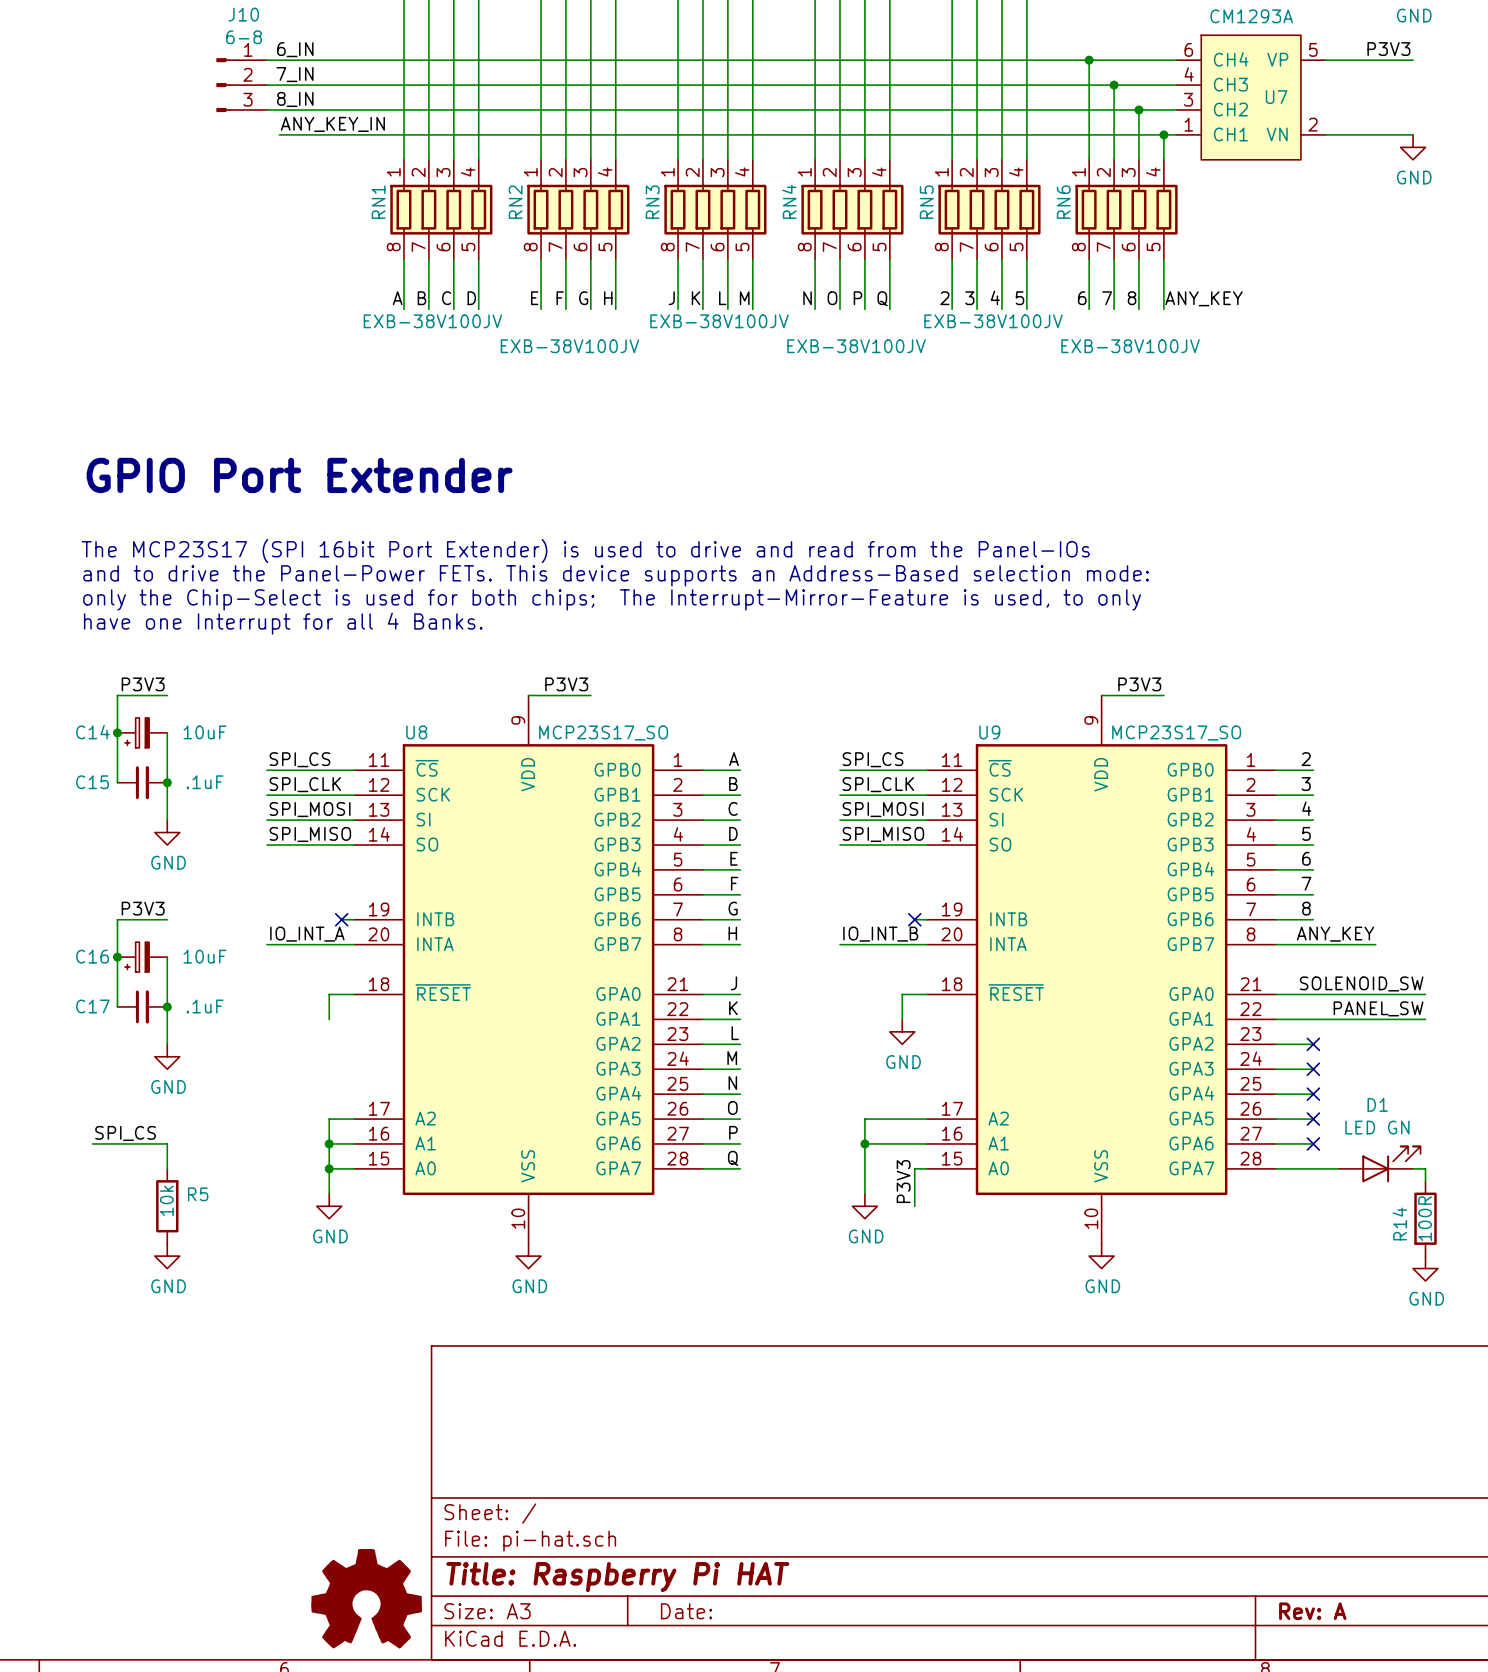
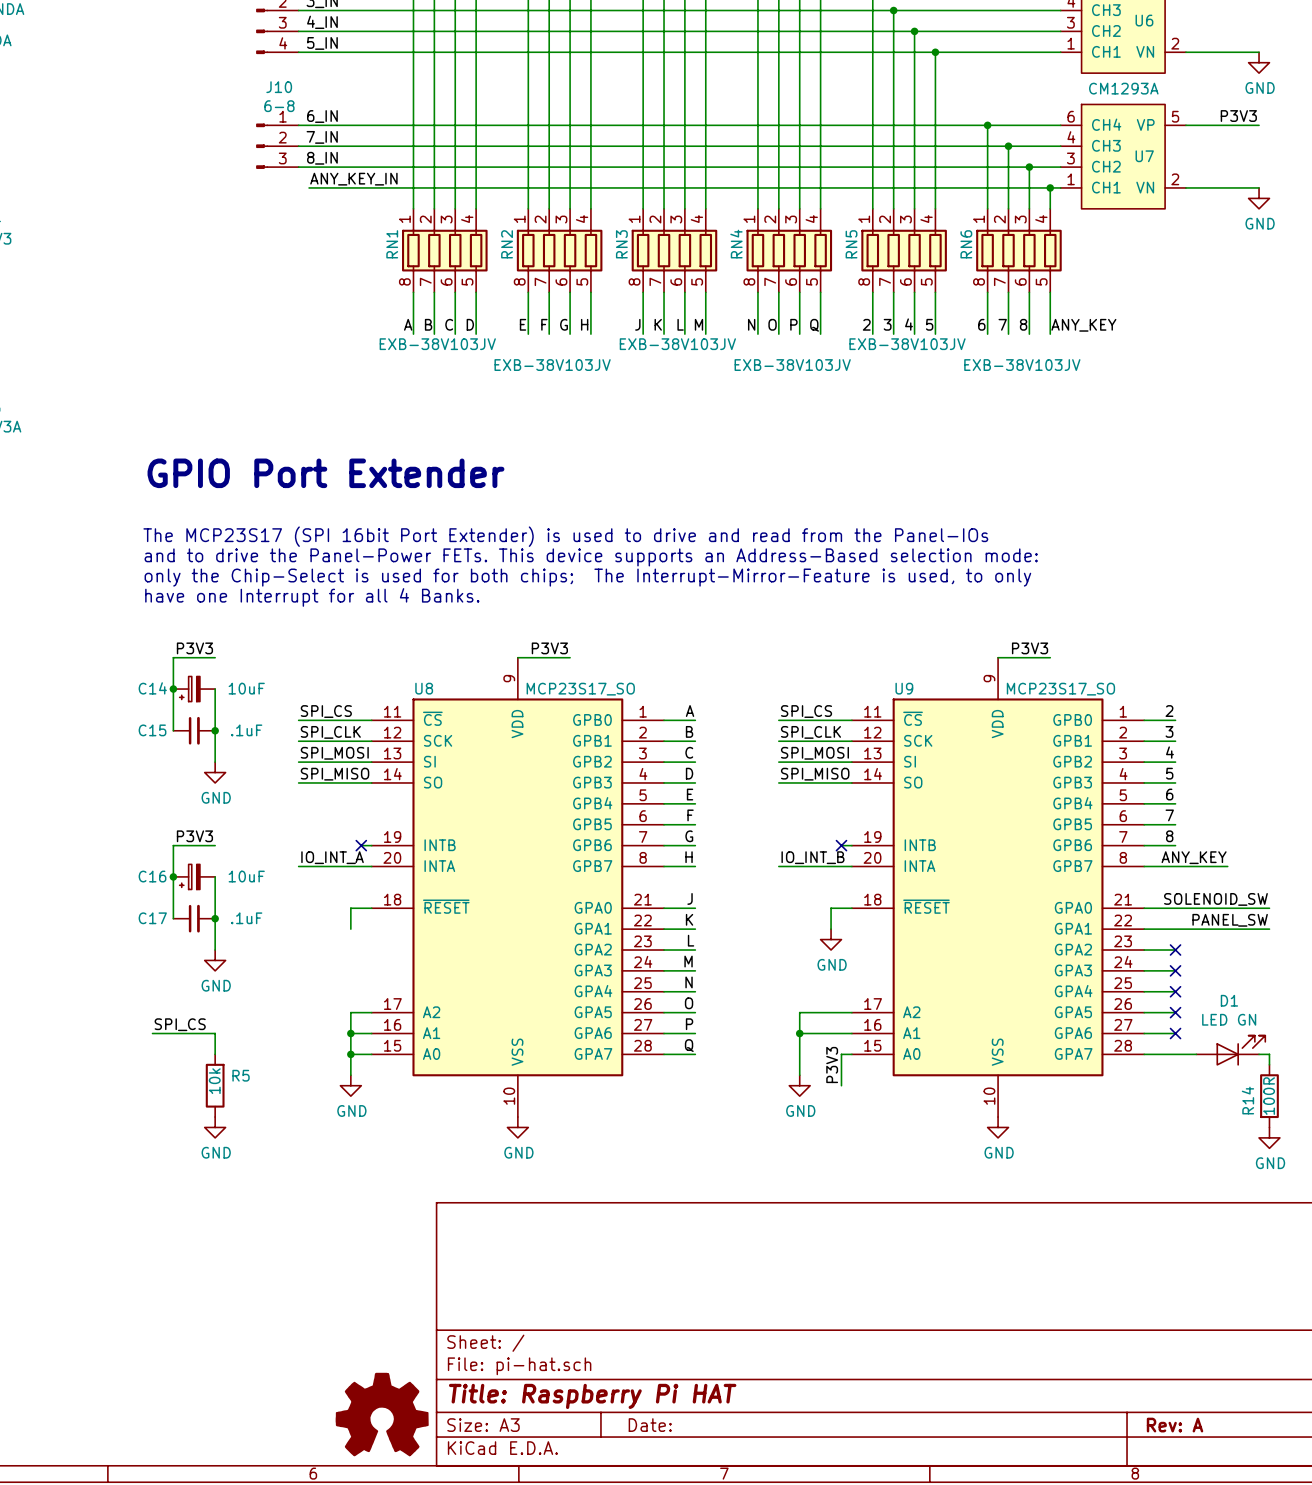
RN1 value: EXB-38V100JV (432, 321) -> EXB-38V103JV (437, 344)
RN3 value: EXB-38V100JV (719, 321) -> EXB-38V103JV (677, 344)
RN5 value: EXB-38V100JV (993, 321) -> EXB-38V103JV (907, 344)
RN2 value: EXB-38V100JV (569, 346) -> EXB-38V103JV (552, 365)
RN4 value: EXB-38V100JV (856, 346) -> EXB-38V103JV (792, 365)
RN6 value: EXB-38V100JV (1130, 346) -> EXB-38V103JV (1022, 365)

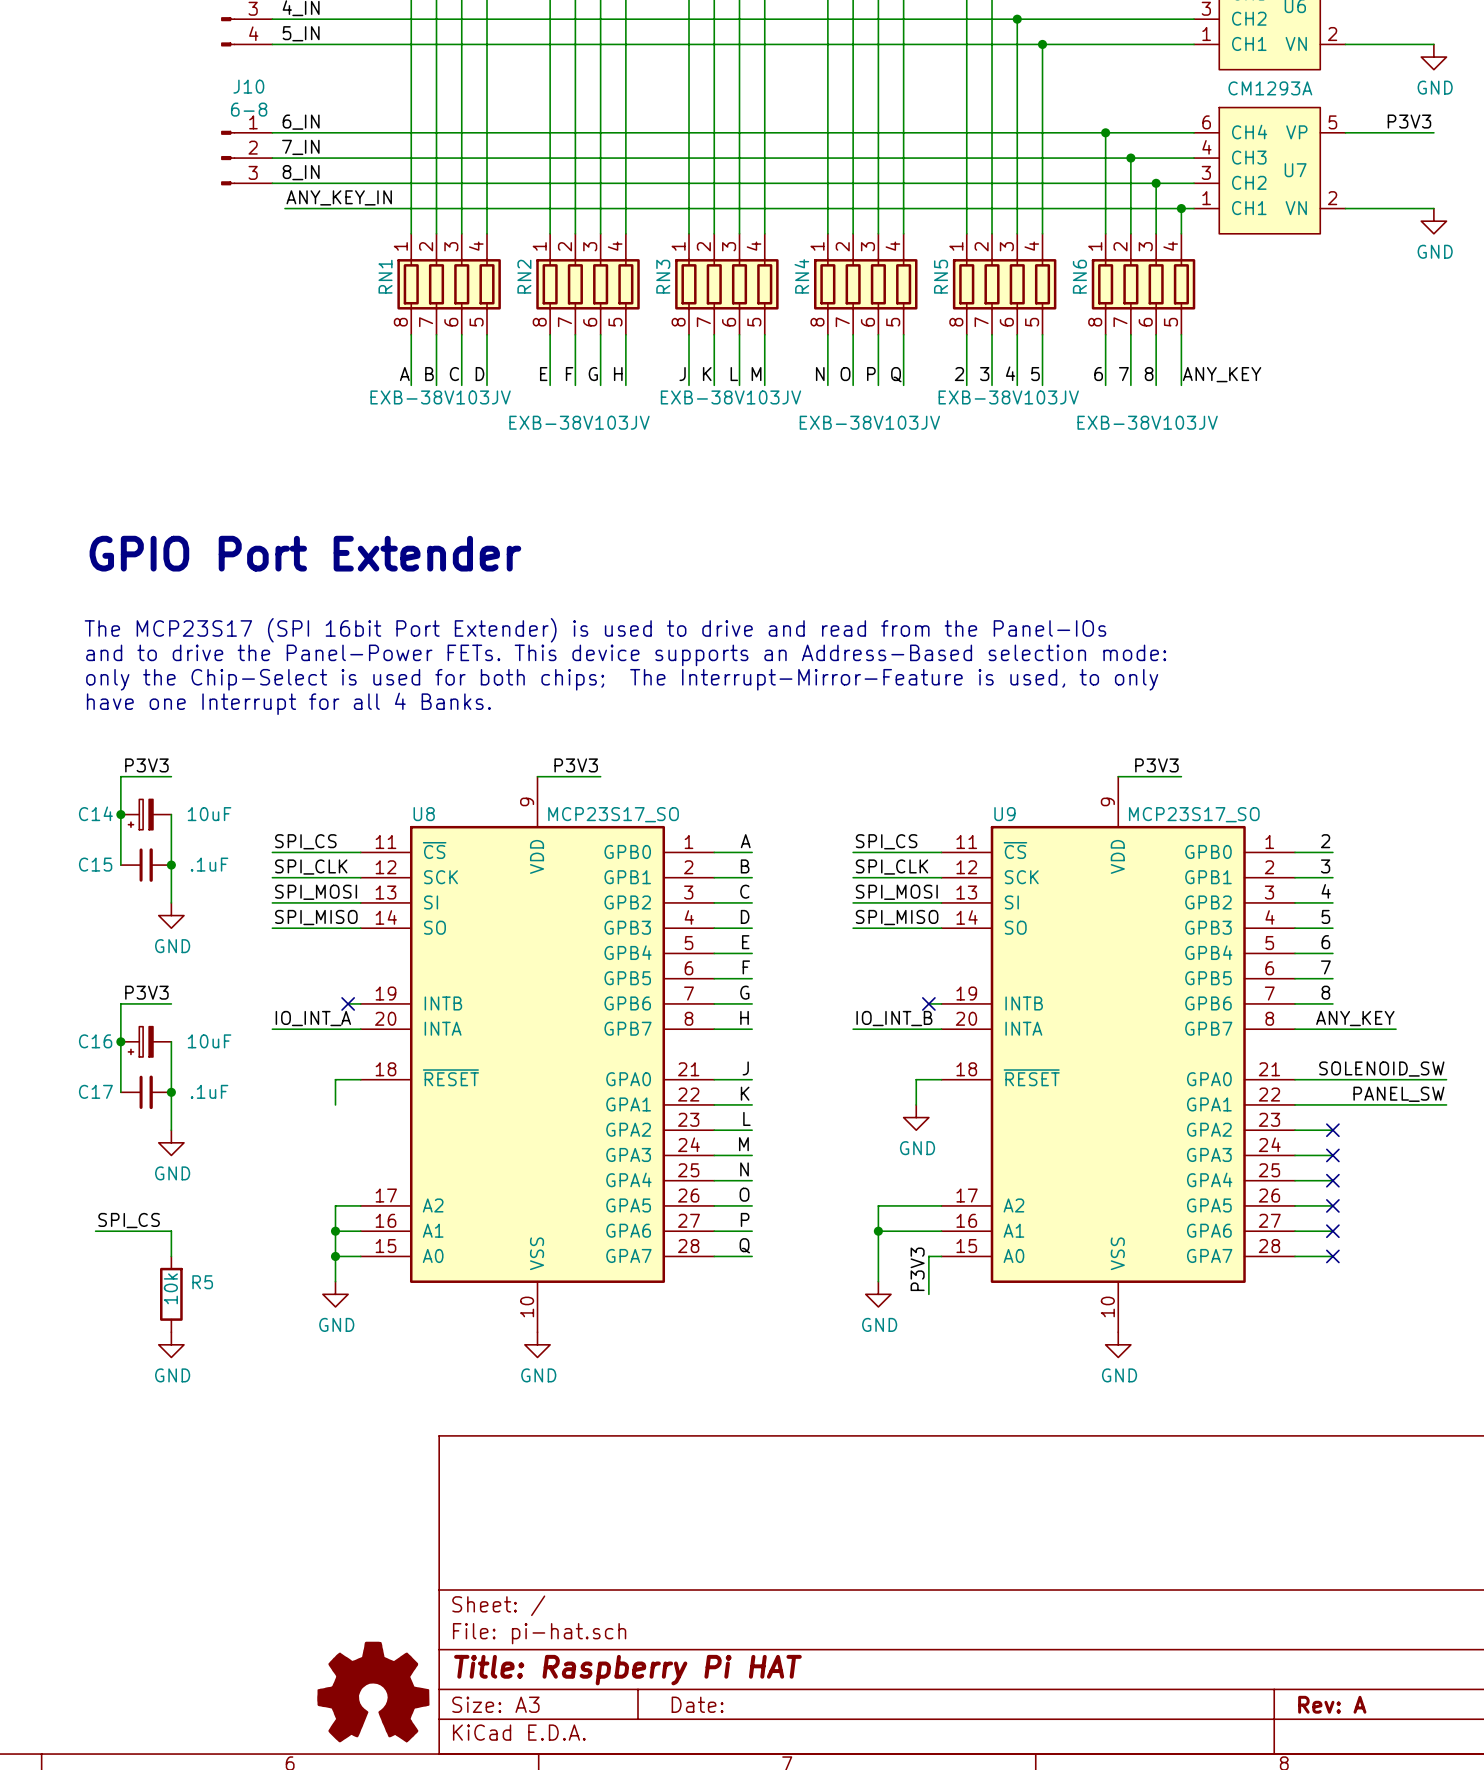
D1: LED GN (1230, 1050) -> none
wire: (1175, 1054) (1196, 1054) -> none
no-connect mark: none -> (1332, 1256)
wire: (1259, 1054) (1269, 1054) (1269, 1064) -> none
R14: 100R (1269, 1096) -> none
power symbol: GND (1269, 1137) -> none

